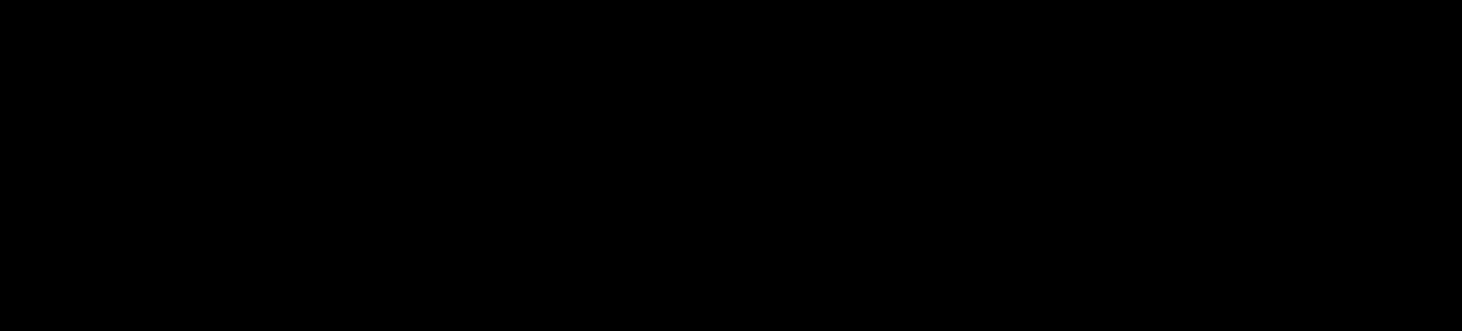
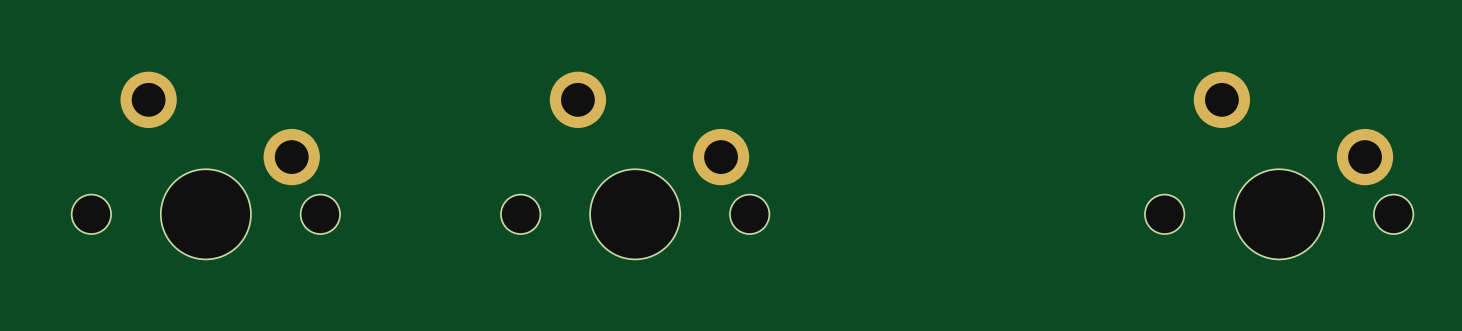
part: none -> (205, 165)
part: none -> (635, 165)
part: none -> (1279, 165)

